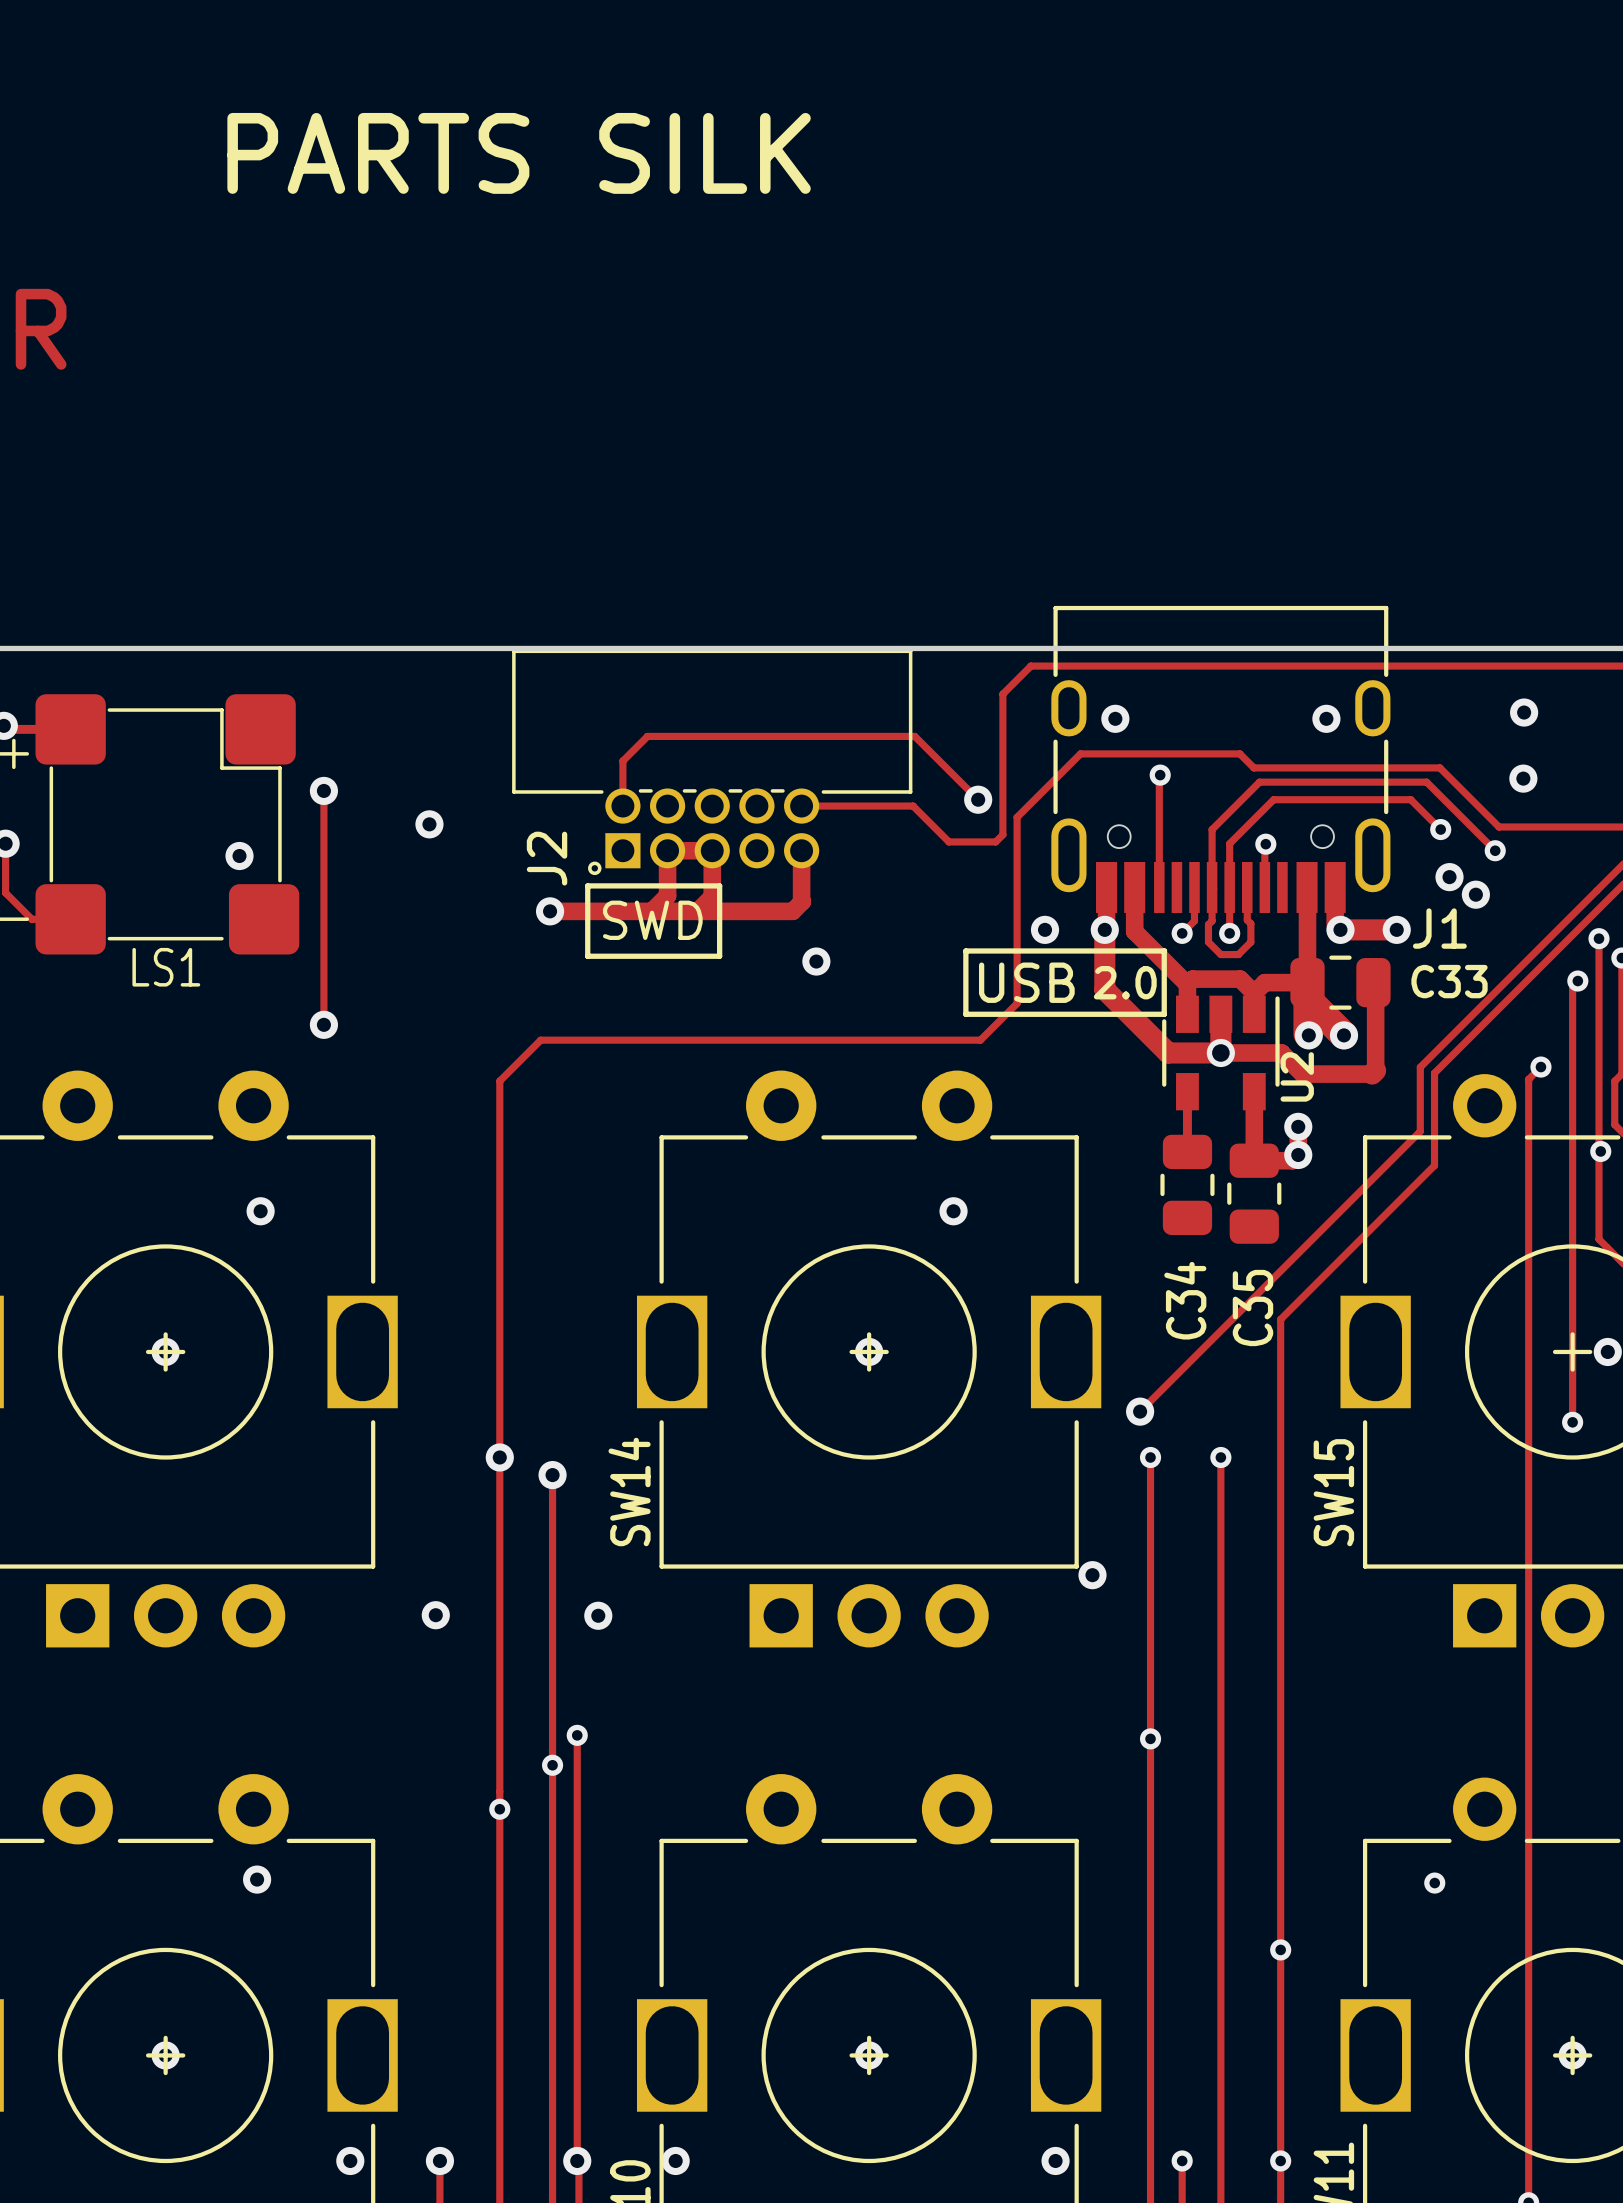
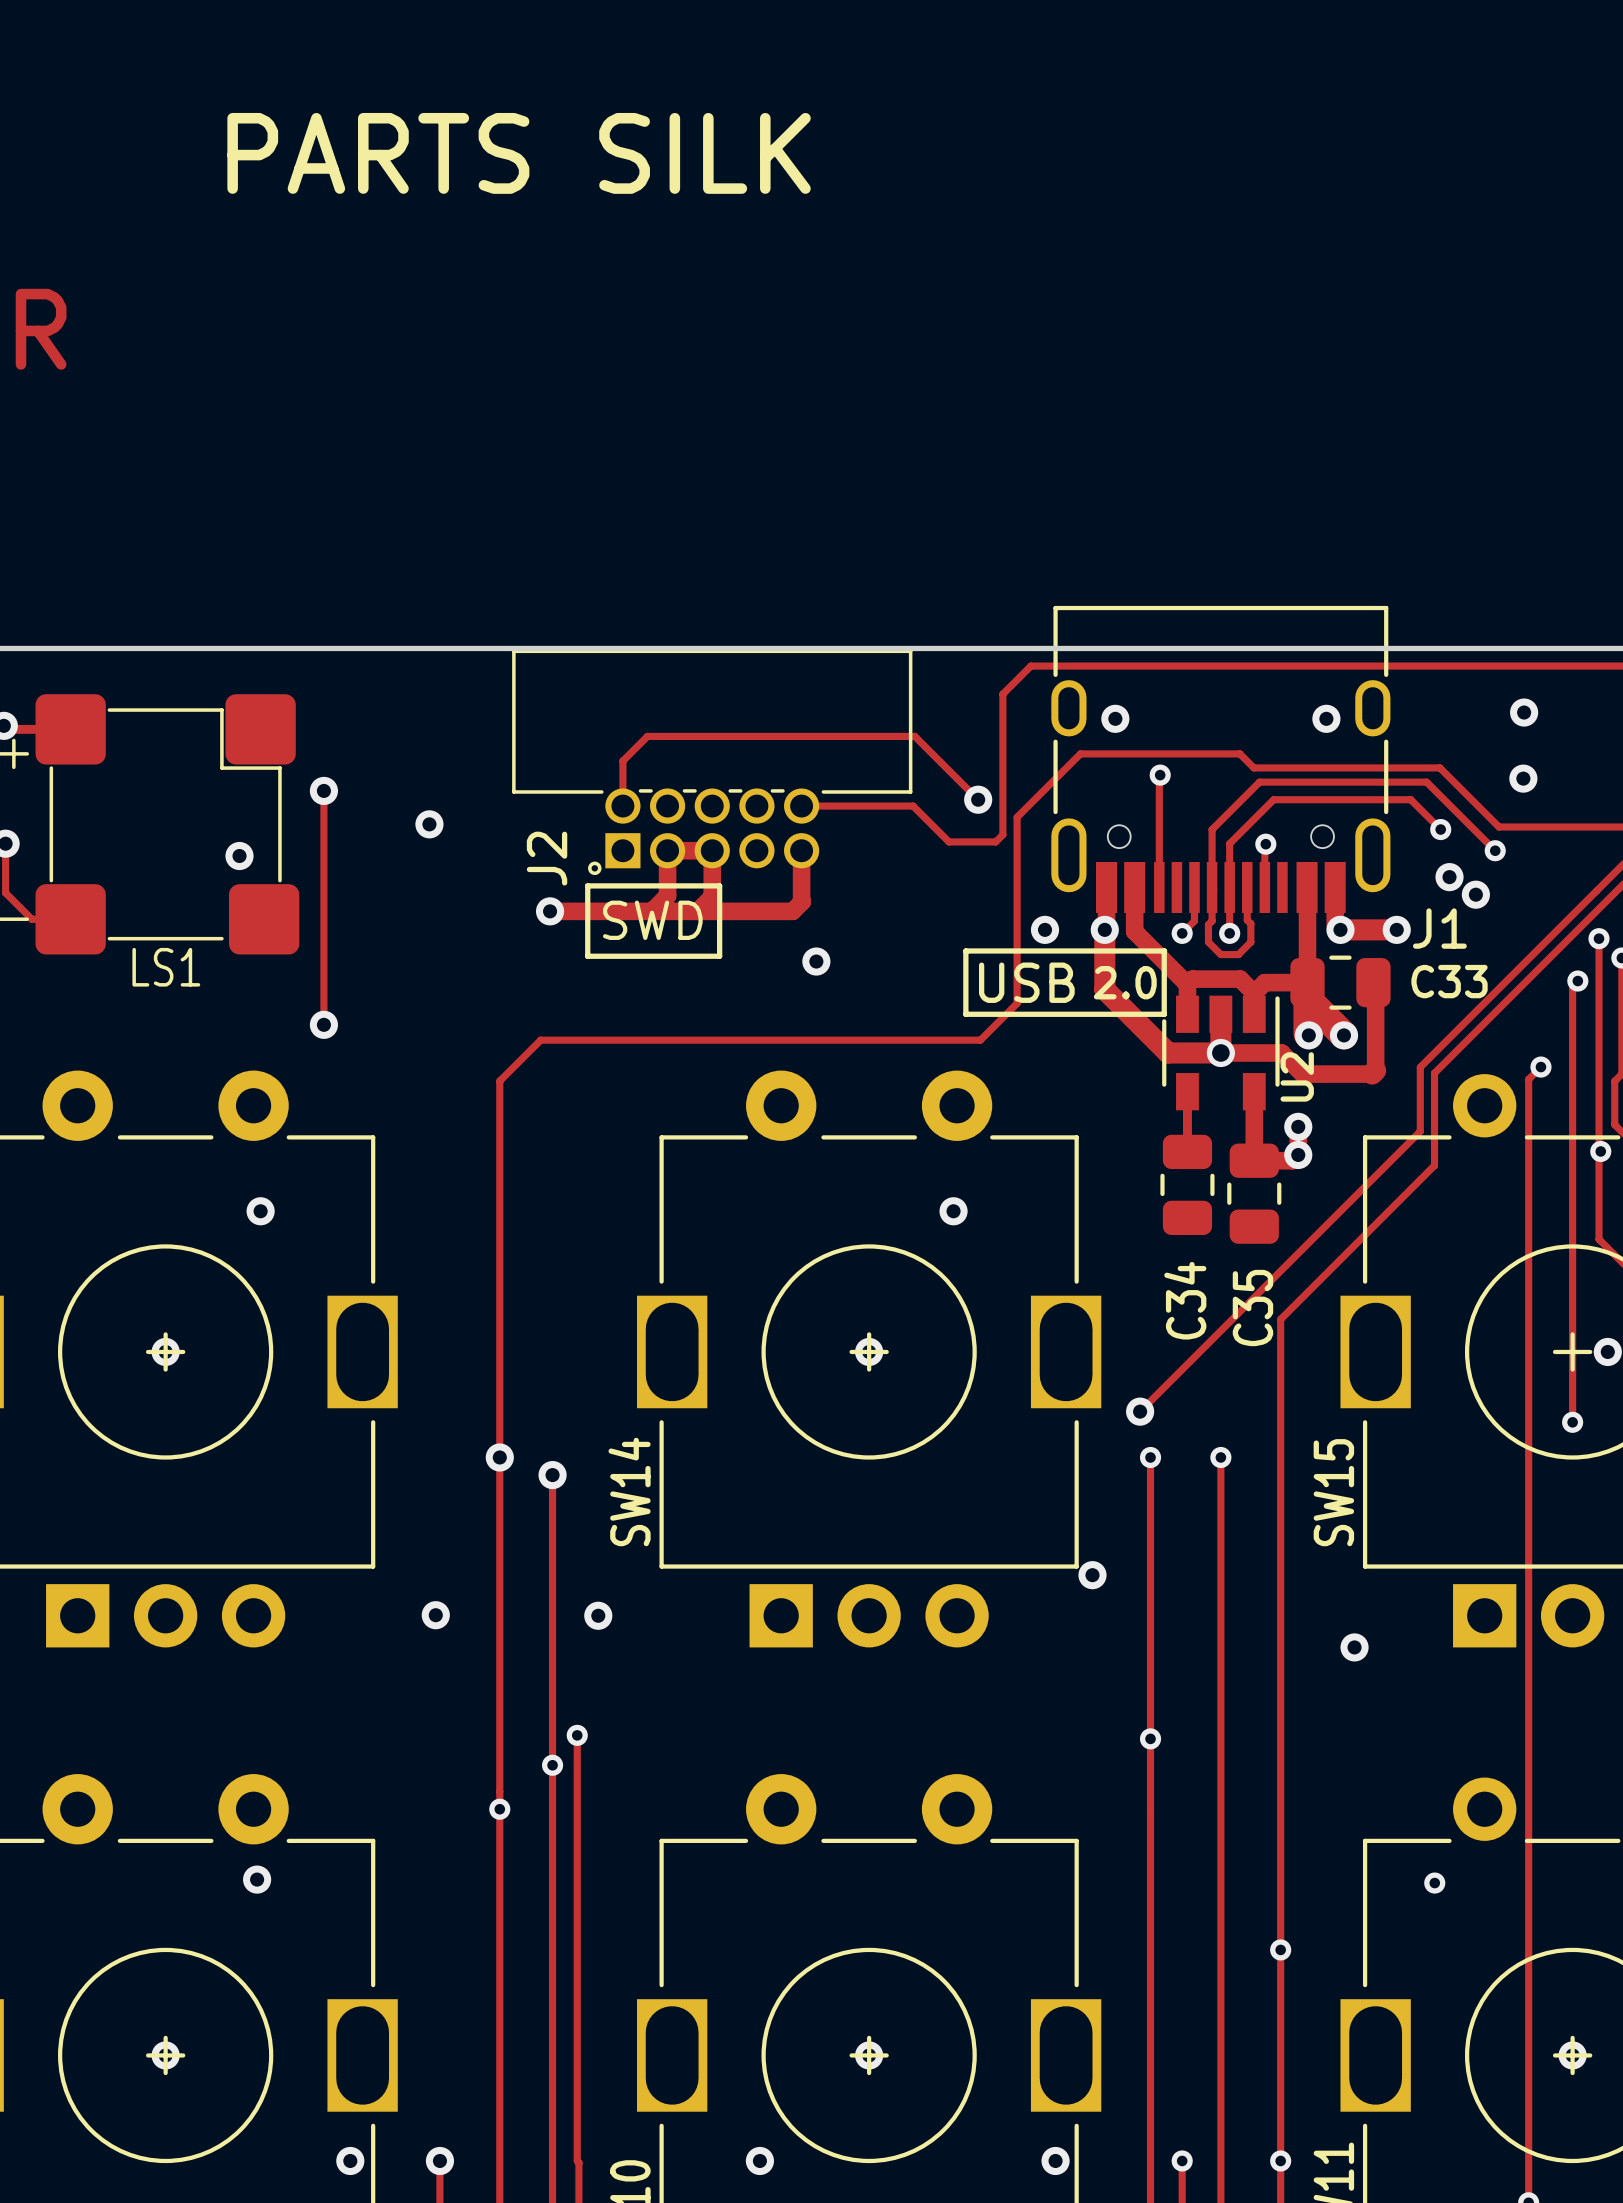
via: none -> (1354, 1647)
via: (577, 2160) -> none
via position: (675, 2160) -> (759, 2160)

